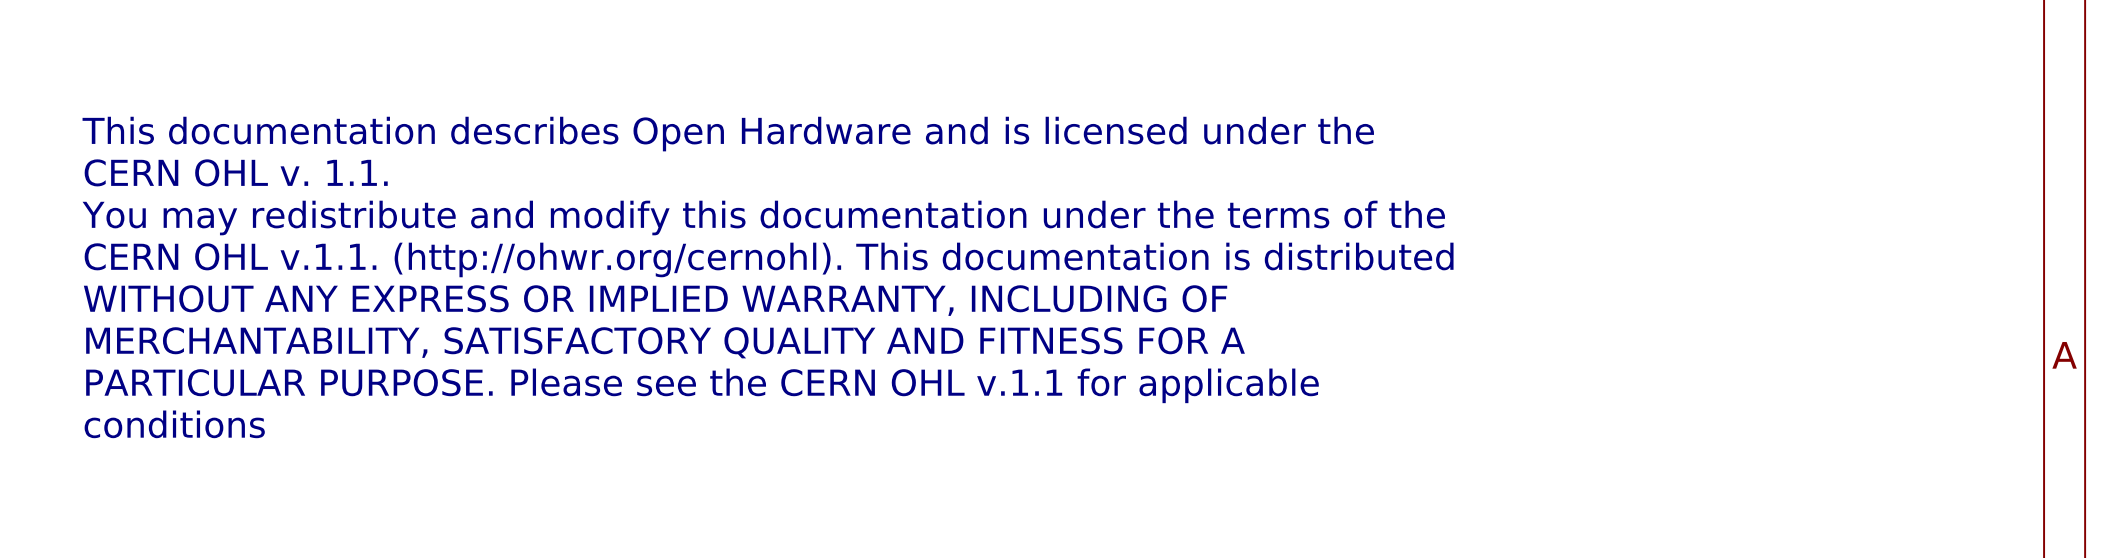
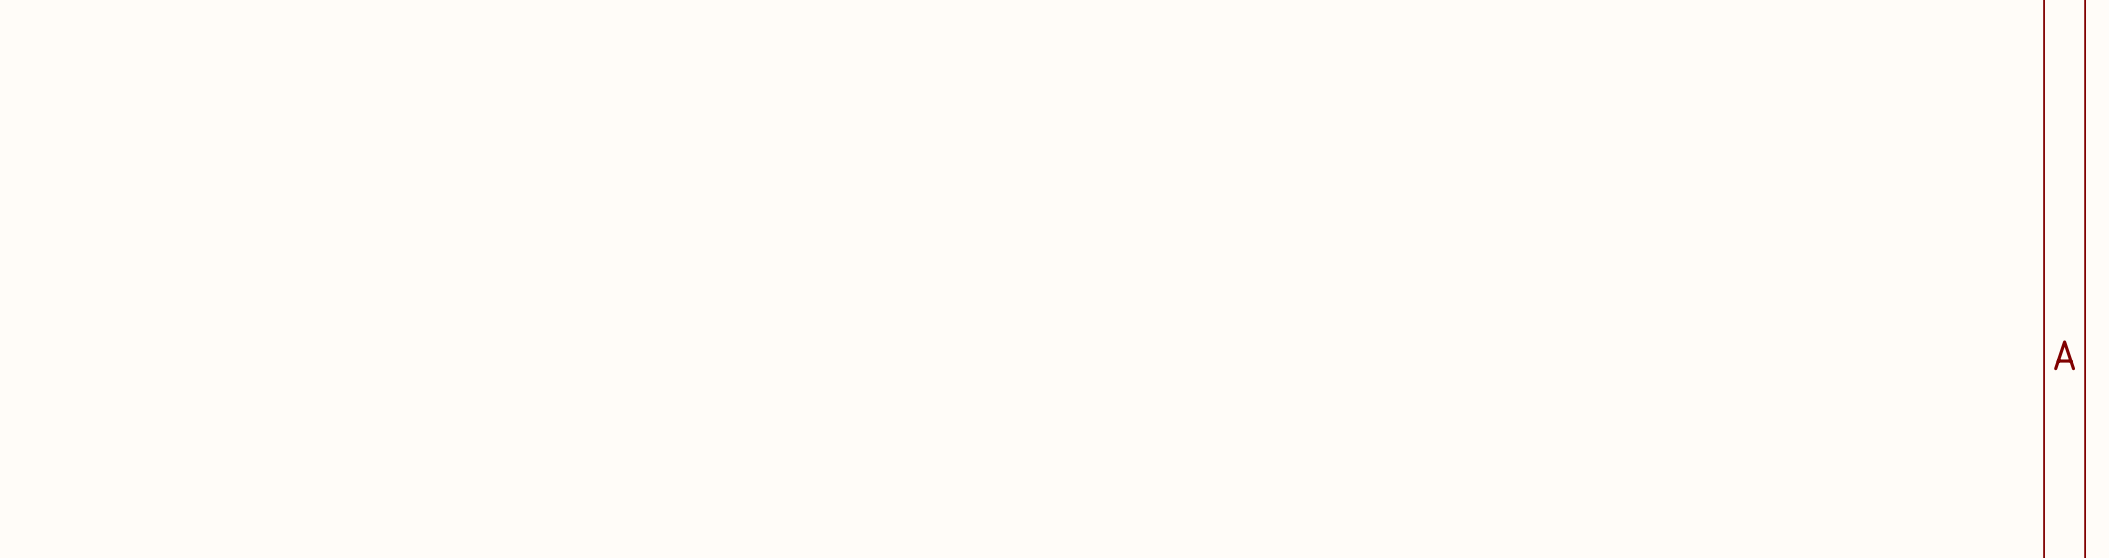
text: This documentation describes Open Hardware and is licensed under the (728, 134) -> none
text: CERN OHL v. 1.1. (236, 172) -> none
text: You may redistribute and modify this documentation under the terms of the (763, 217) -> none
text: CERN OHL v.1.1. (http://ohwr.org/cernohl). This documentation is distributed (769, 259) -> none
text: WITHOUT ANY EXPRESS OR IMPLIED WARRANTY, INCLUDING OF (655, 300) -> none
text: MERCHANTABILITY, SATISFACTORY QUALITY AND FITNESS FOR A (665, 342) -> none
text: PARTICULAR PURPOSE. Please see the CERN OHL v.1.1 for applicable (702, 385) -> none
text: conditions (174, 424) -> none

